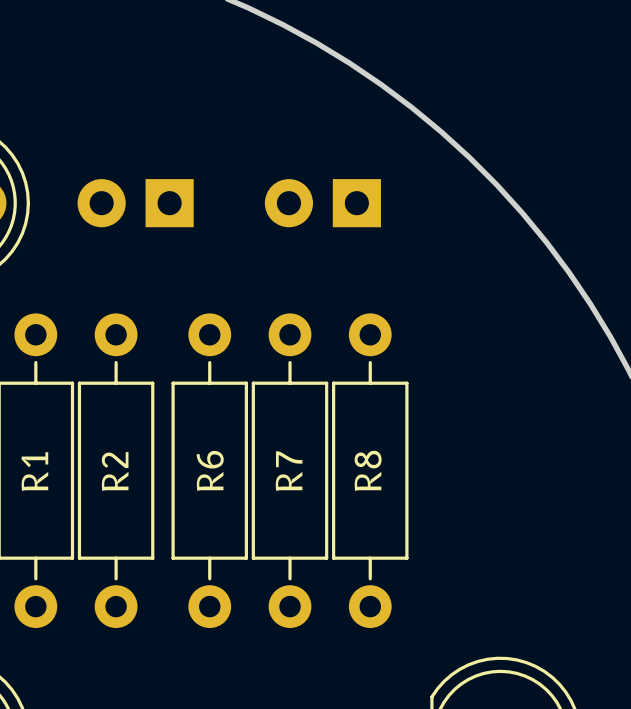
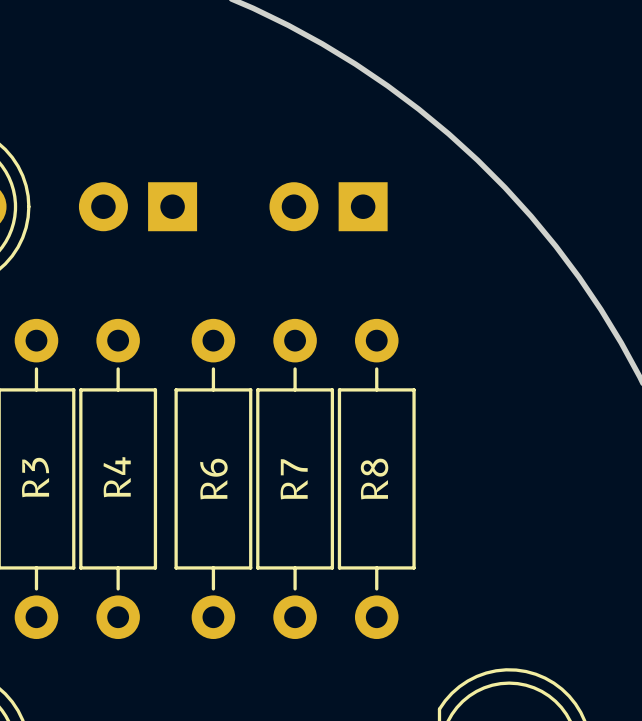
R1 name: R1 (34, 471) -> R3 (35, 477)
R2 name: R2 (115, 471) -> R4 (117, 477)

